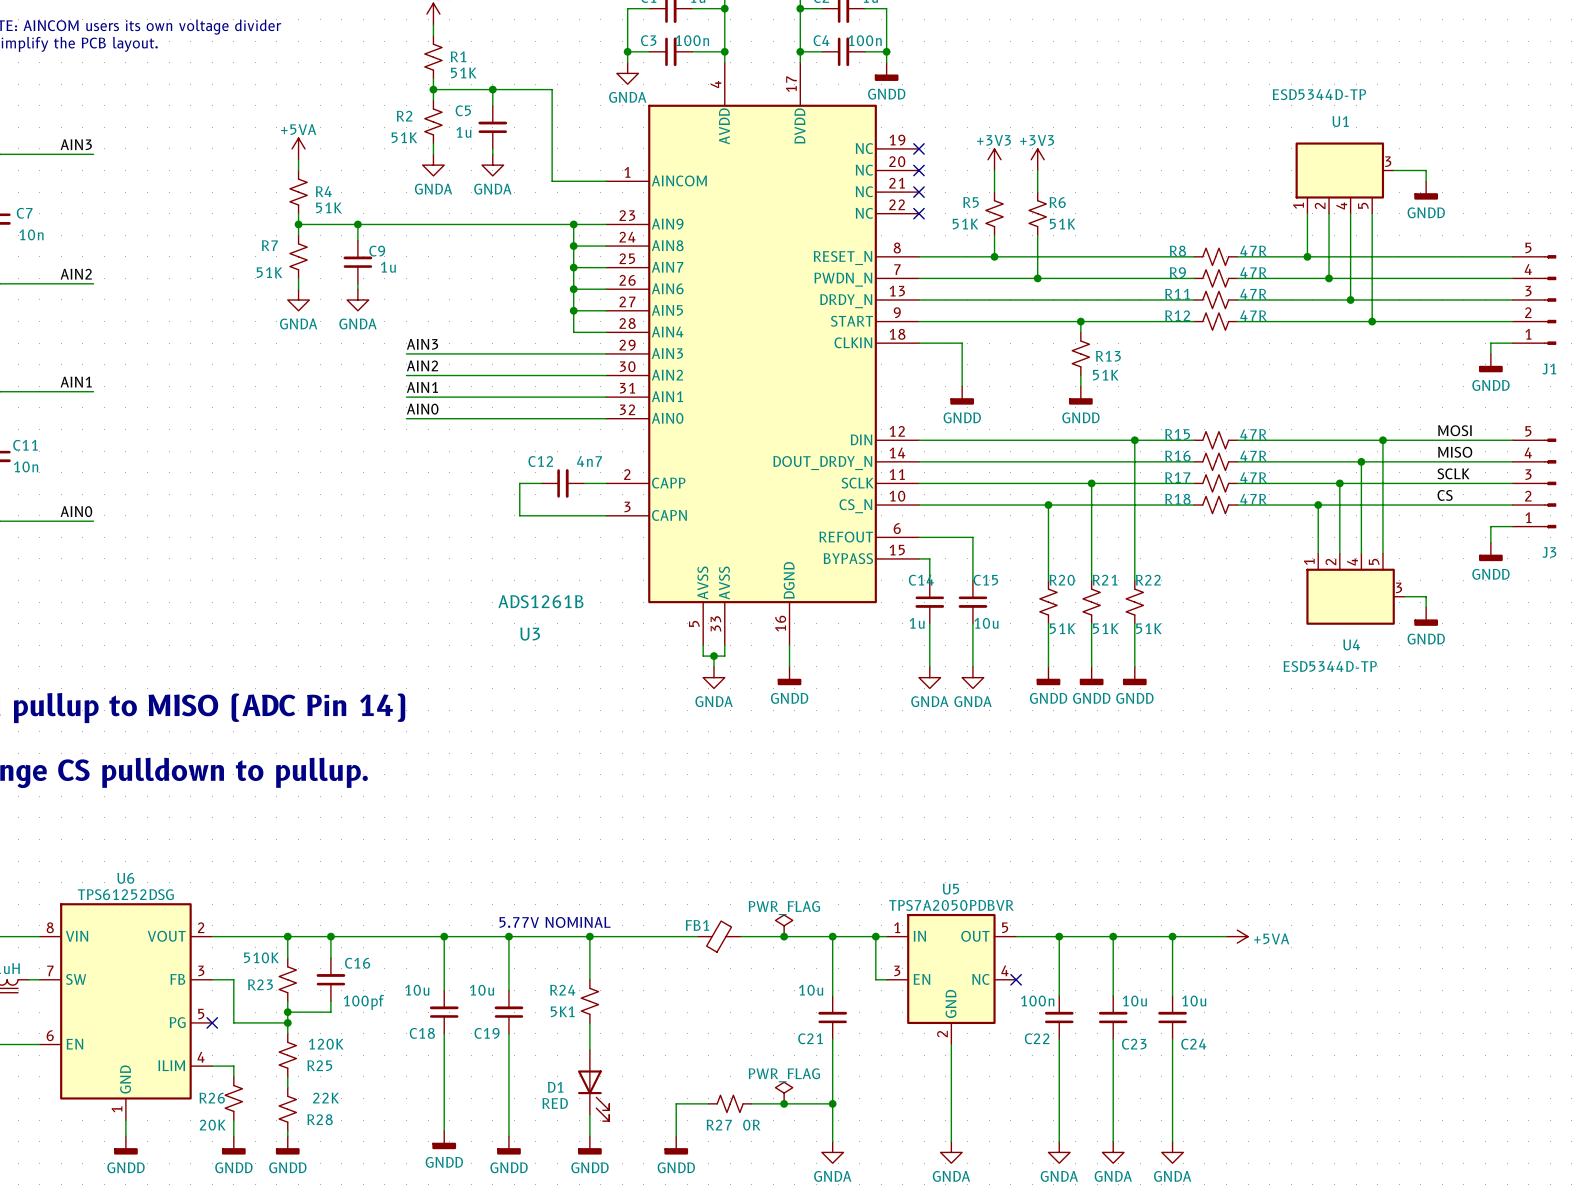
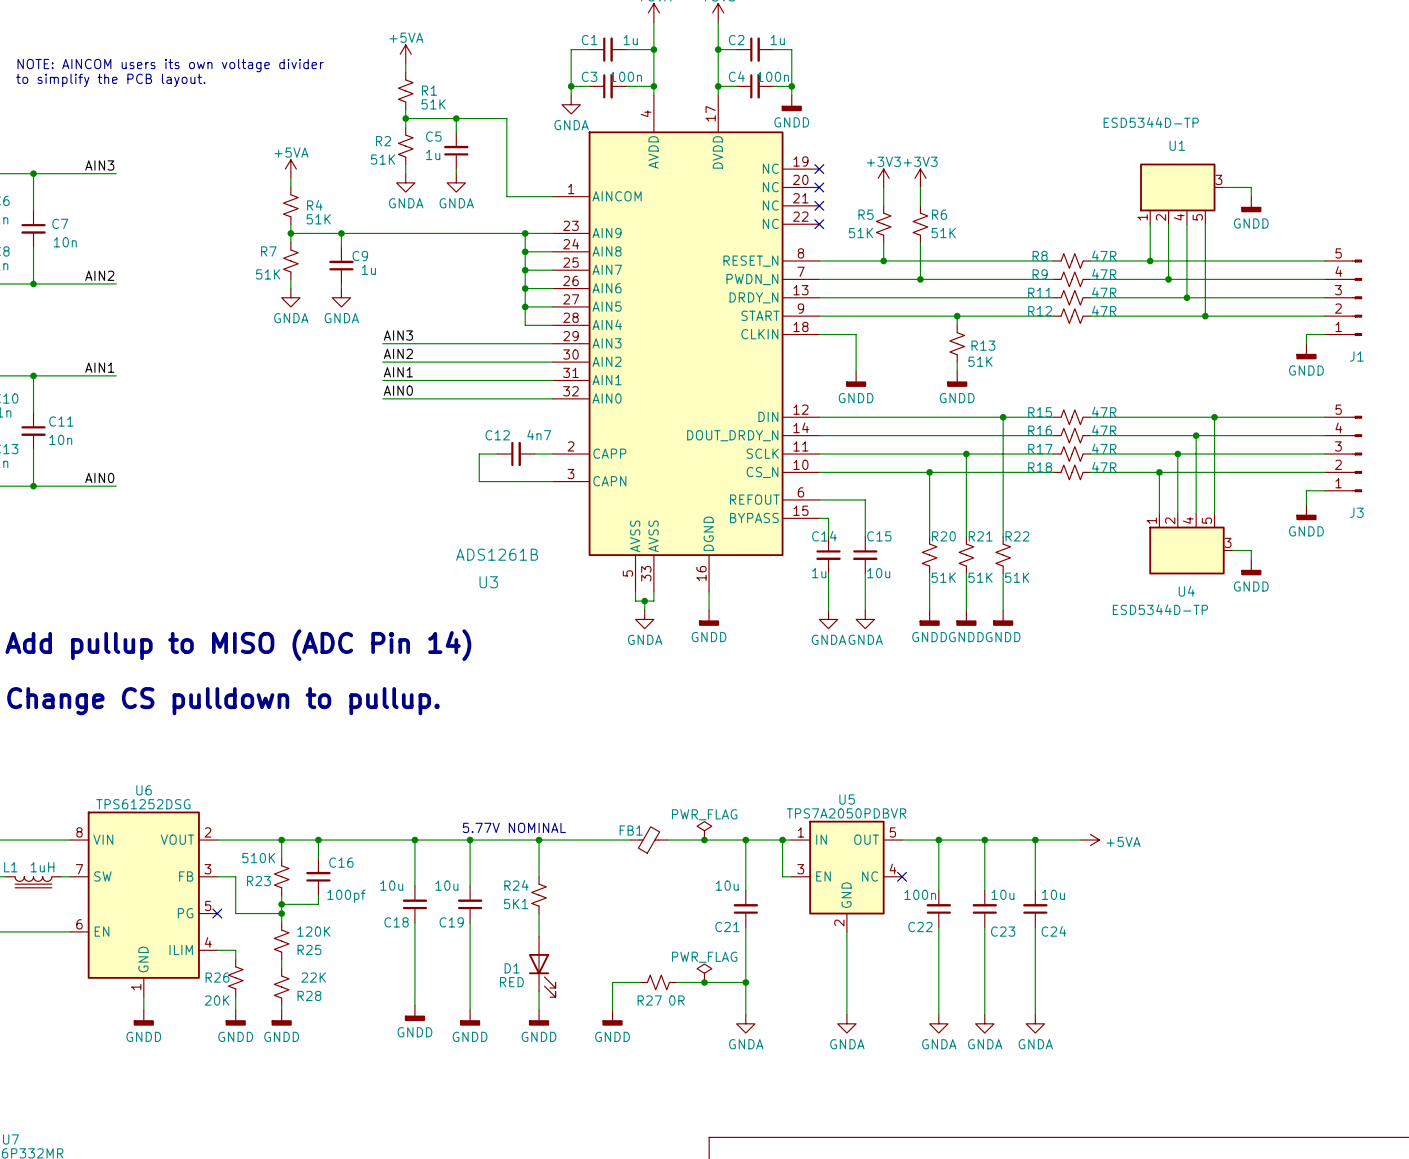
label: MOSI (1454, 430) -> none
label: MISO (1455, 452) -> none
label: SCLK (1453, 473) -> none
label: CS (1445, 495) -> none

